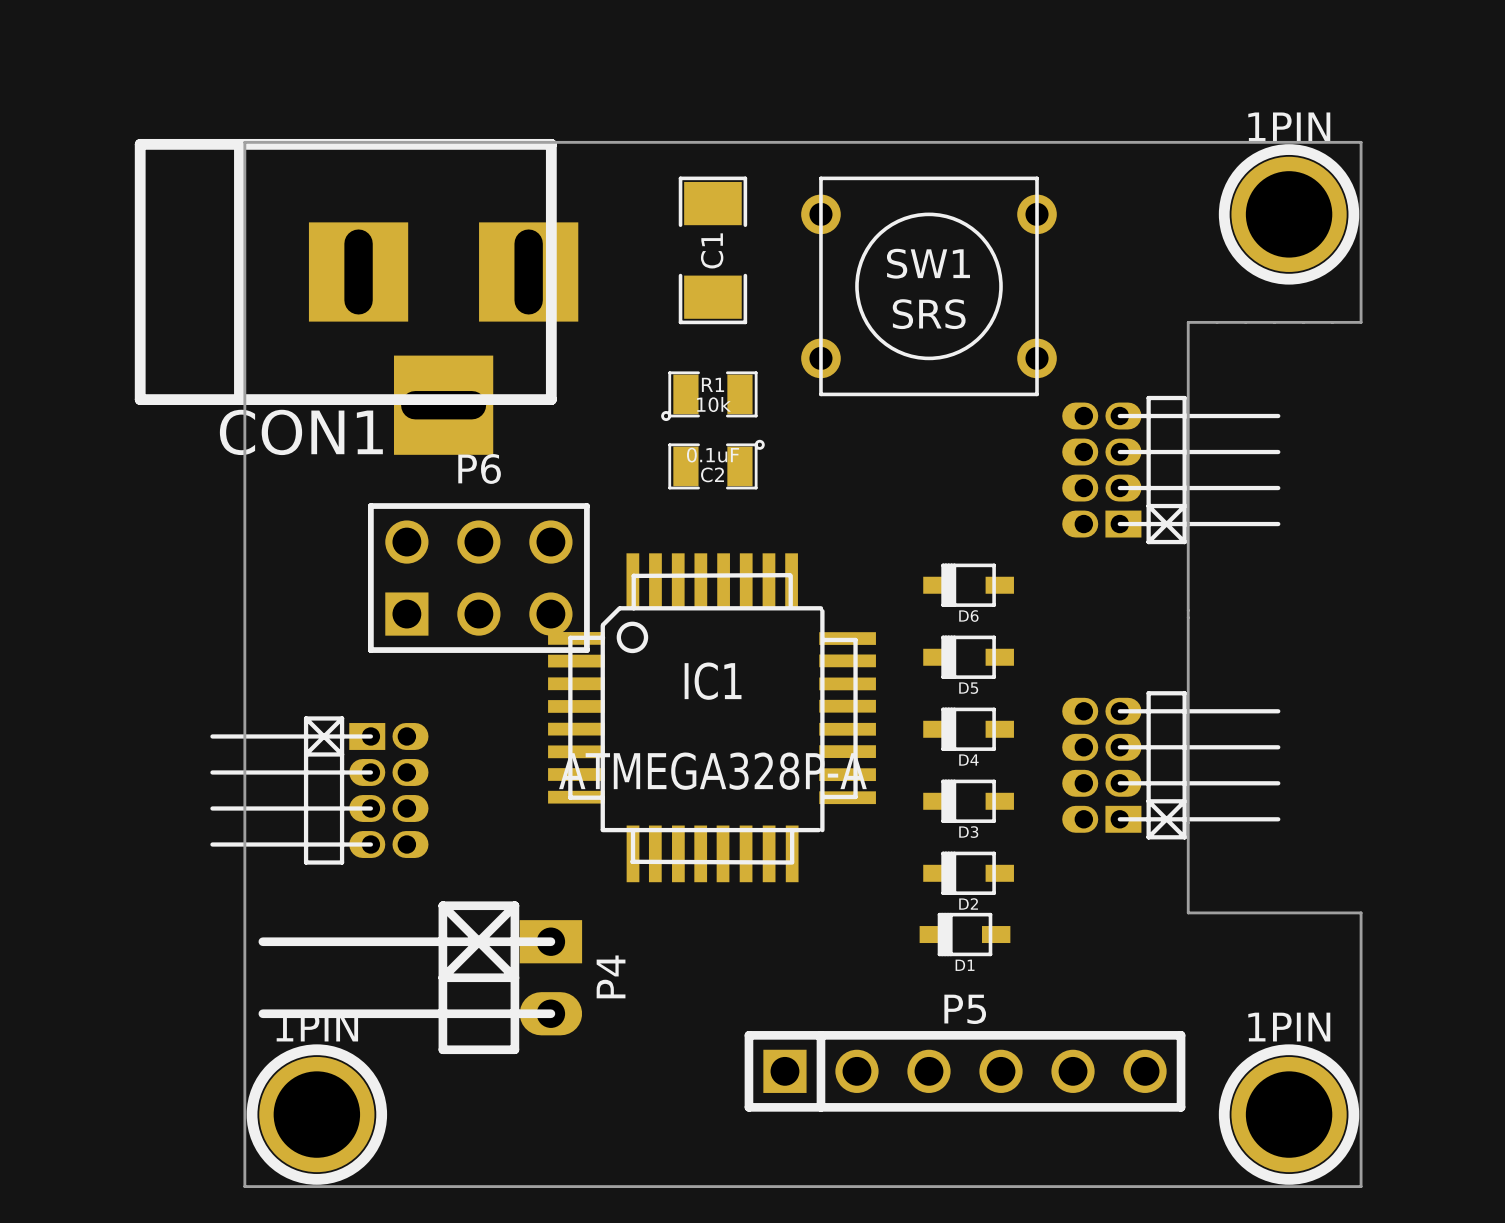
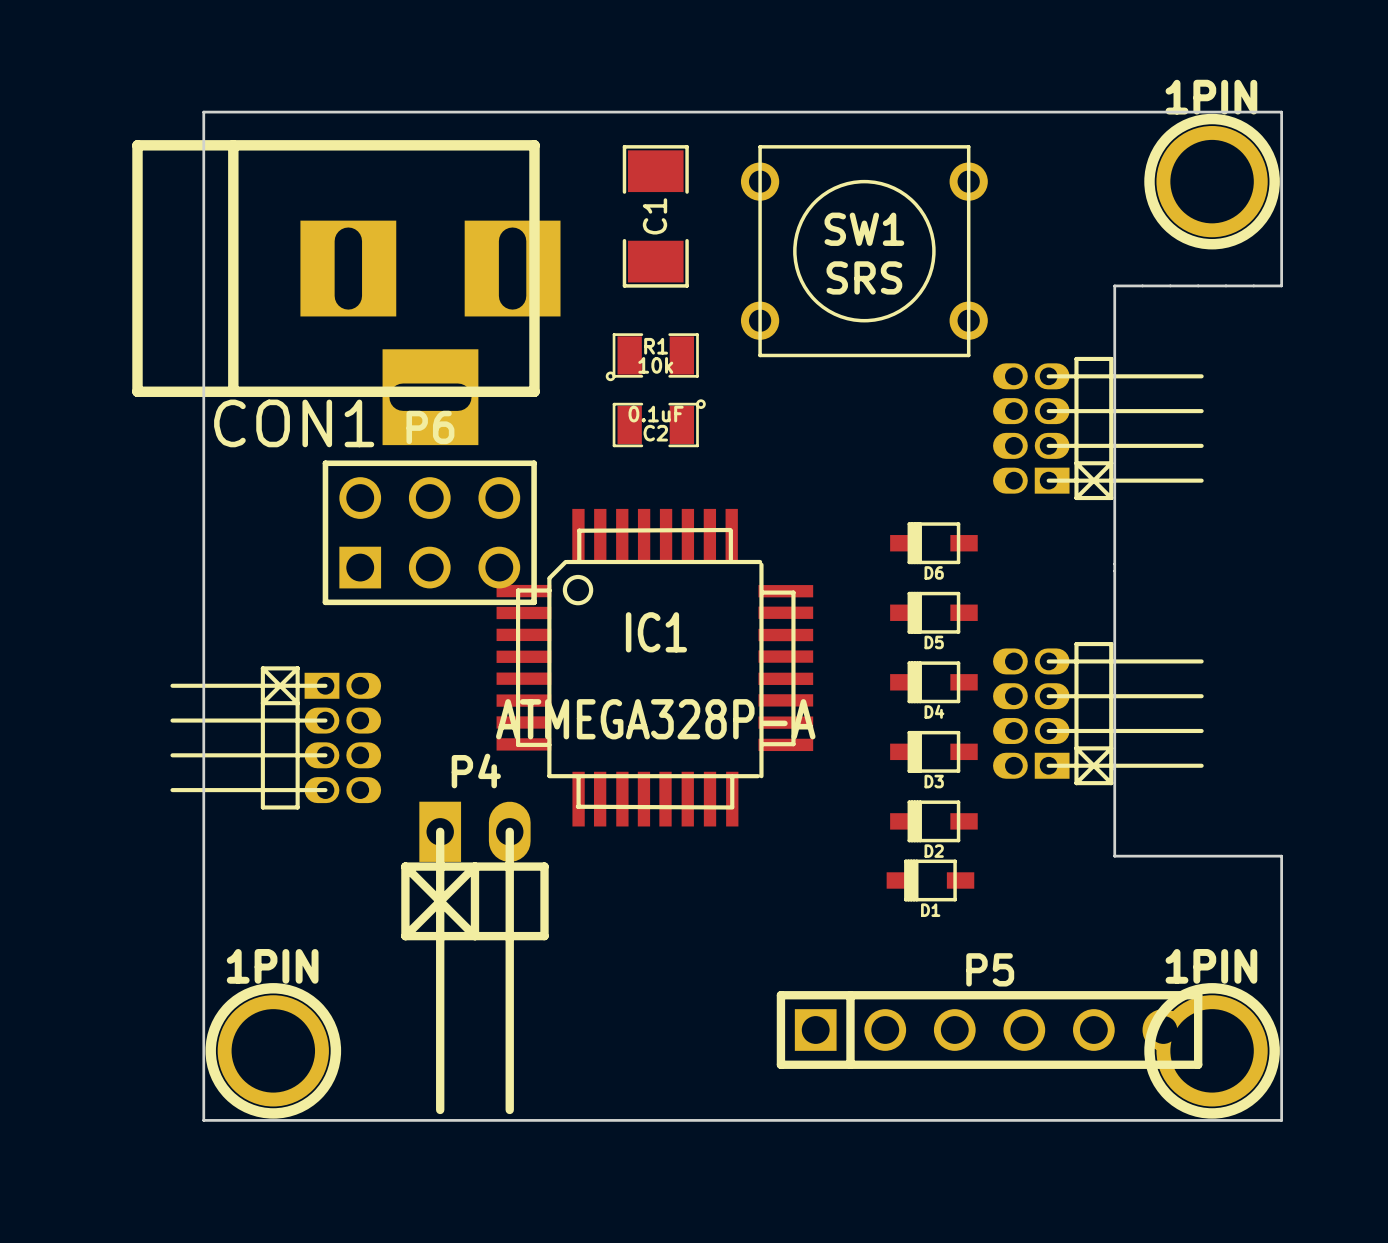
CON1 position: (356, 296) -> (346, 292)
D6 position: (968, 585) -> (933, 543)
D5 position: (968, 657) -> (933, 612)
D4 position: (968, 729) -> (933, 682)
D3 position: (968, 801) -> (933, 751)
D2 position: (968, 873) -> (933, 821)
D1 position: (965, 934) -> (930, 880)
P4 rotation: 0° (420, 977) -> 90° counterclockwise (474, 957)
P5 position: (965, 1071) -> (989, 1030)

